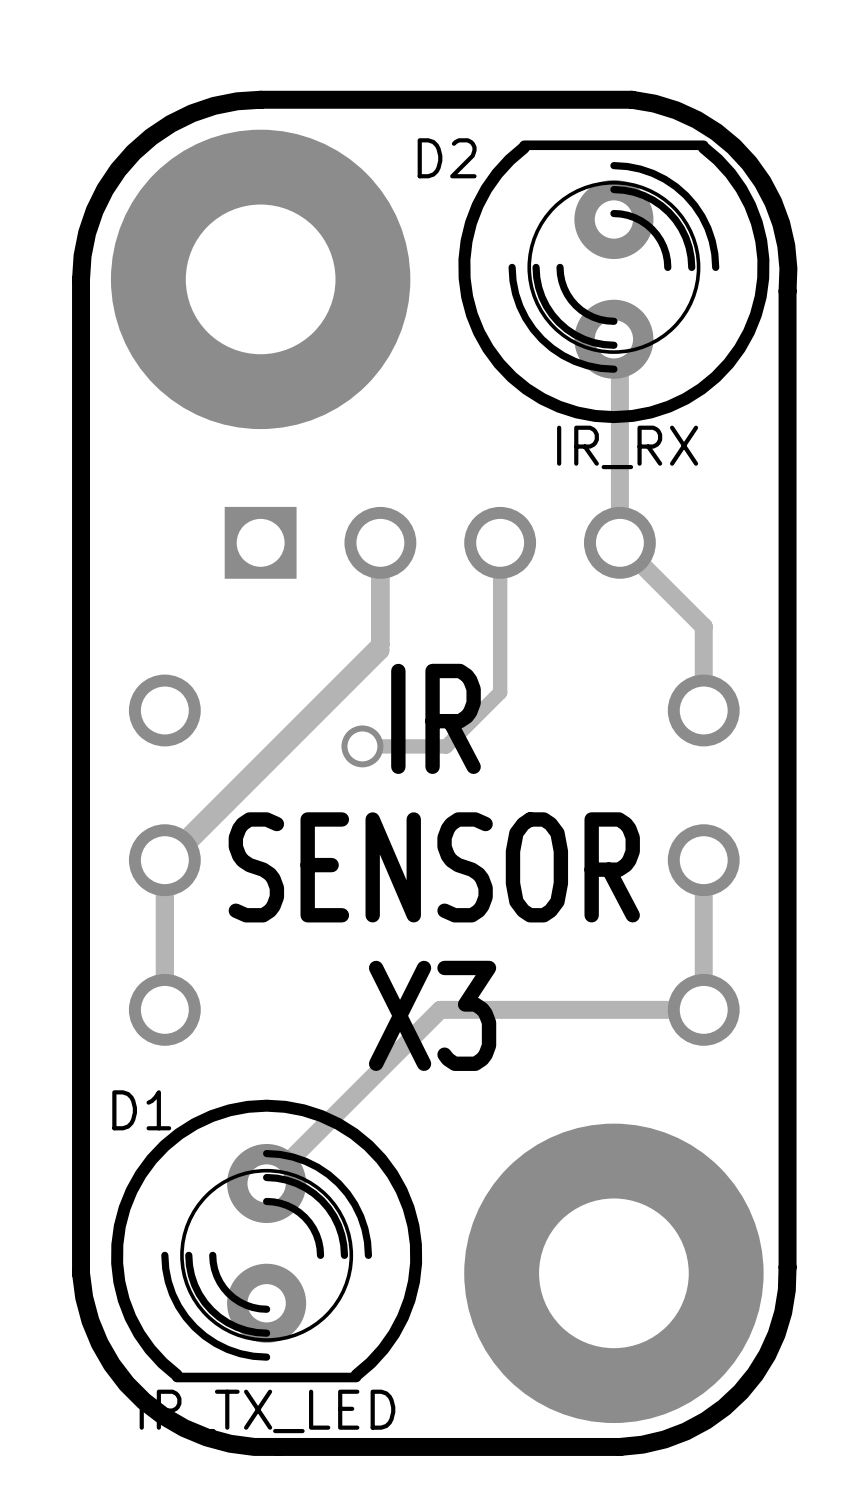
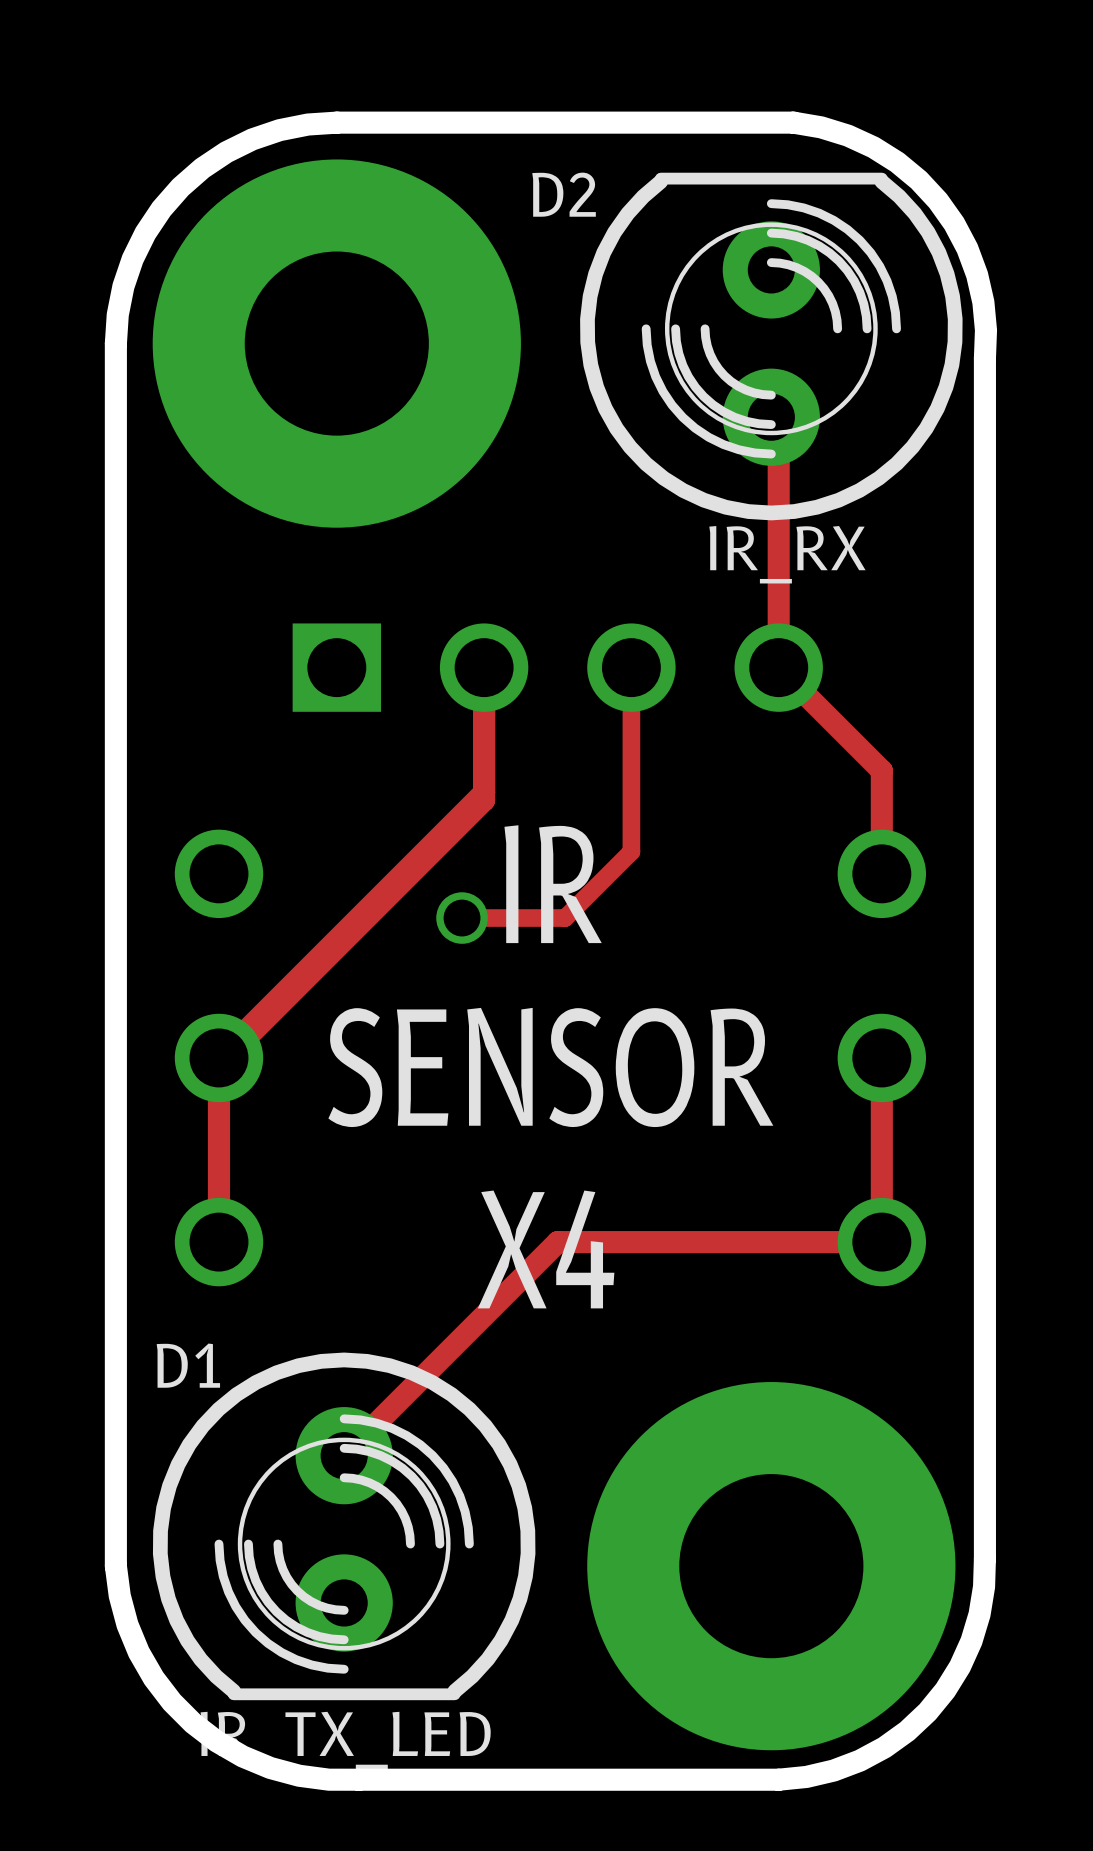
text: X3 (432, 1015) -> X4 (546, 1249)

